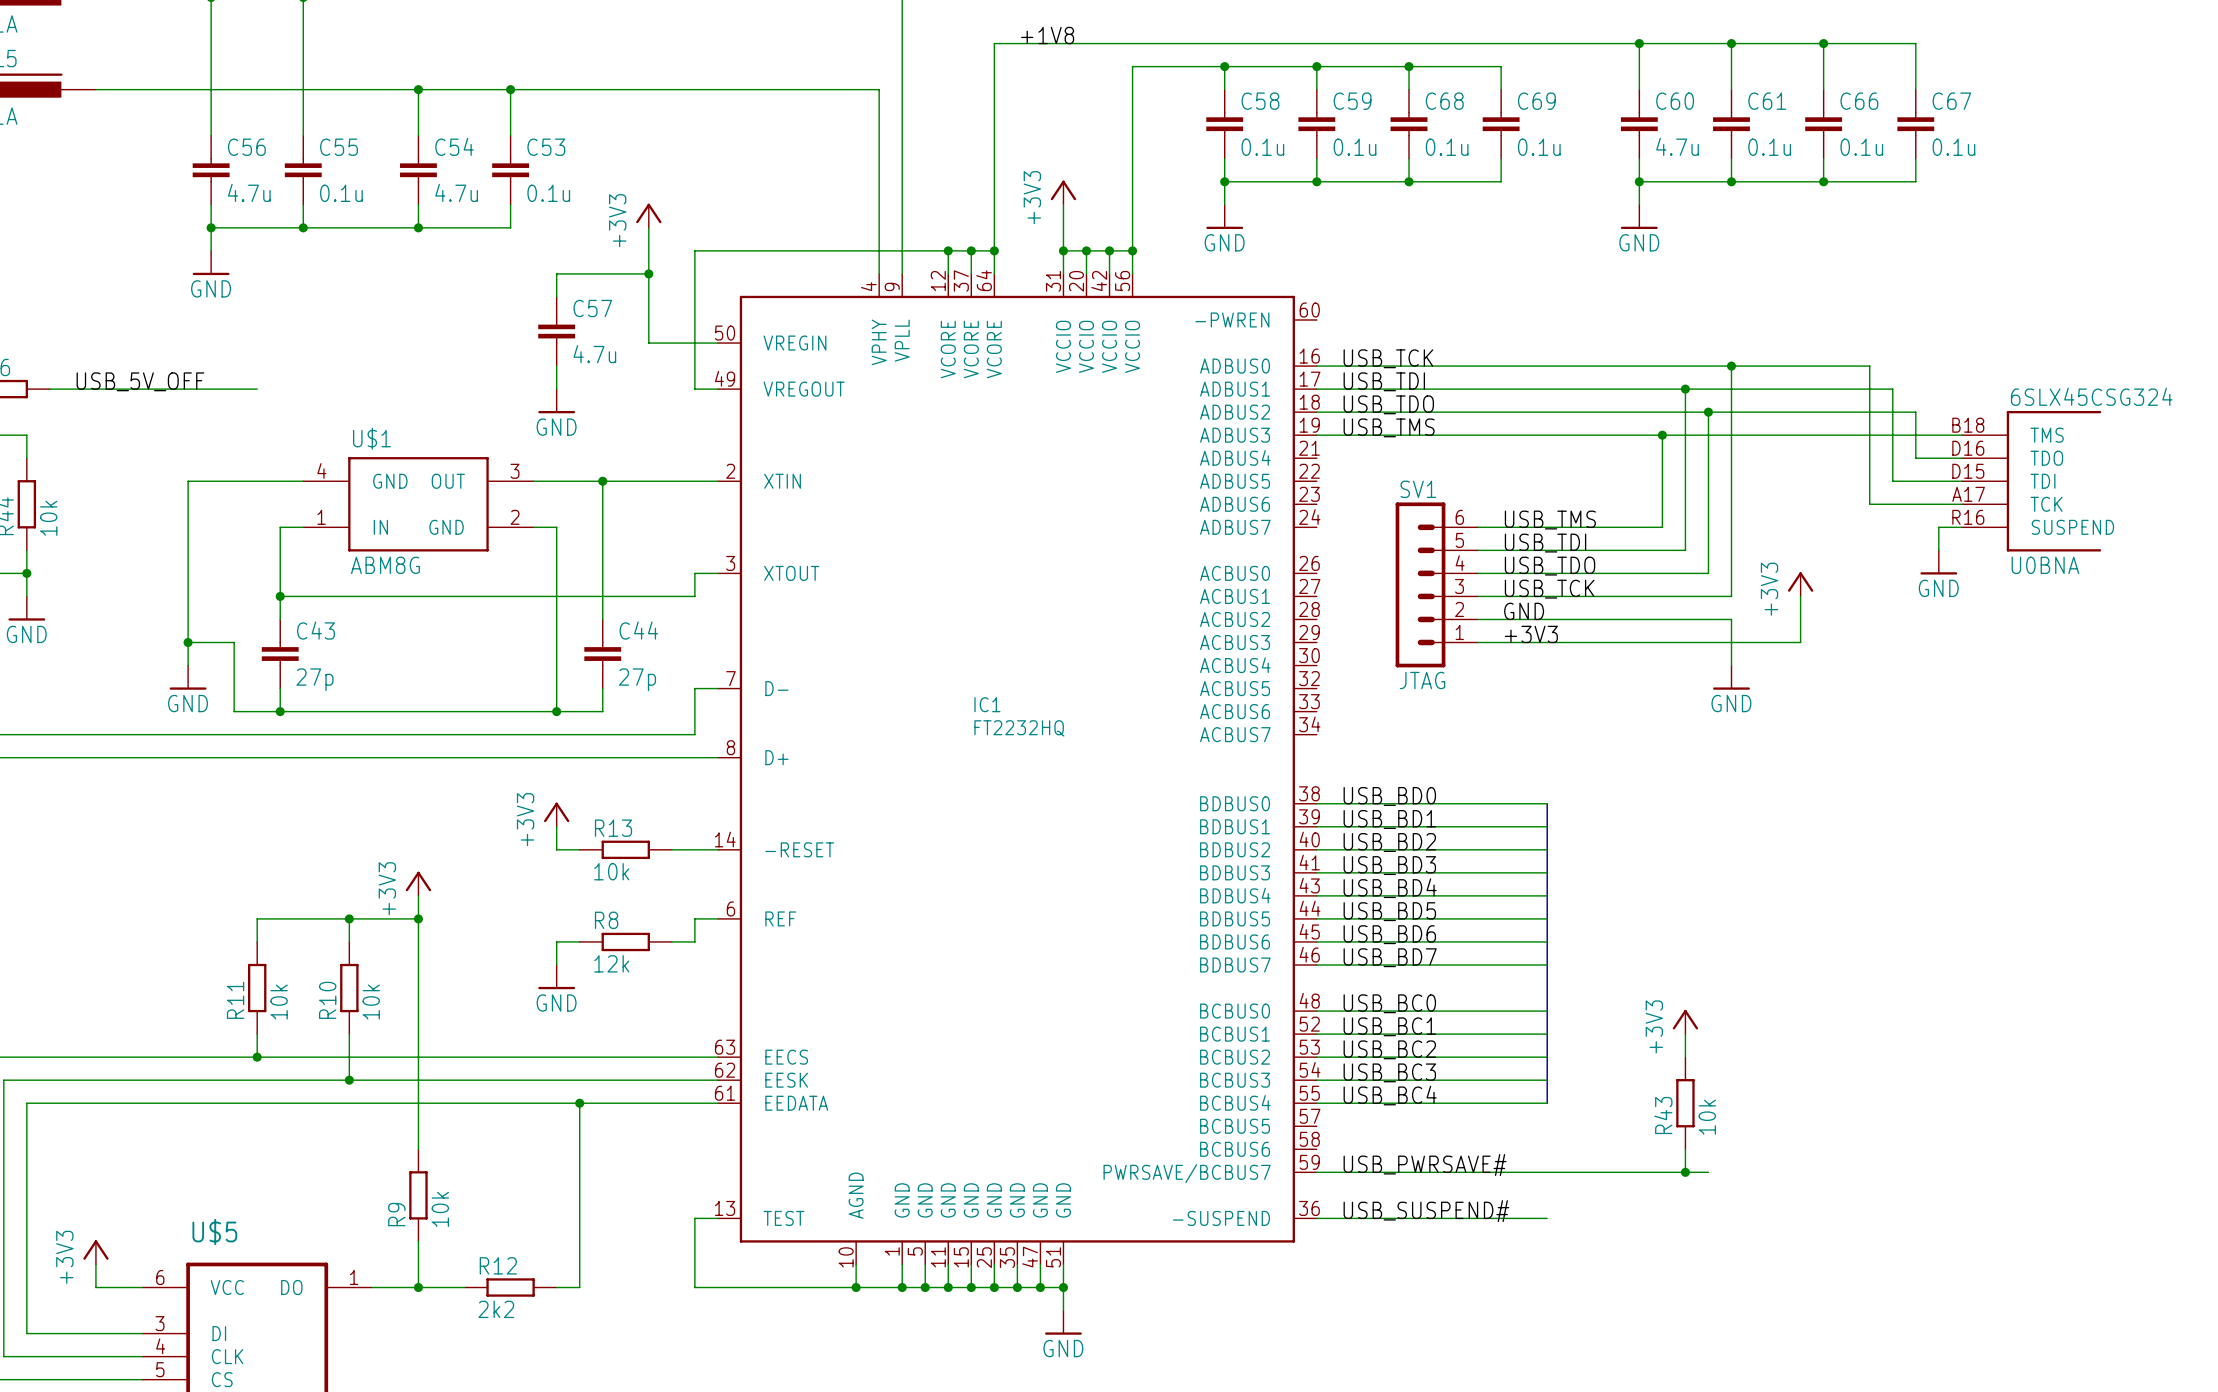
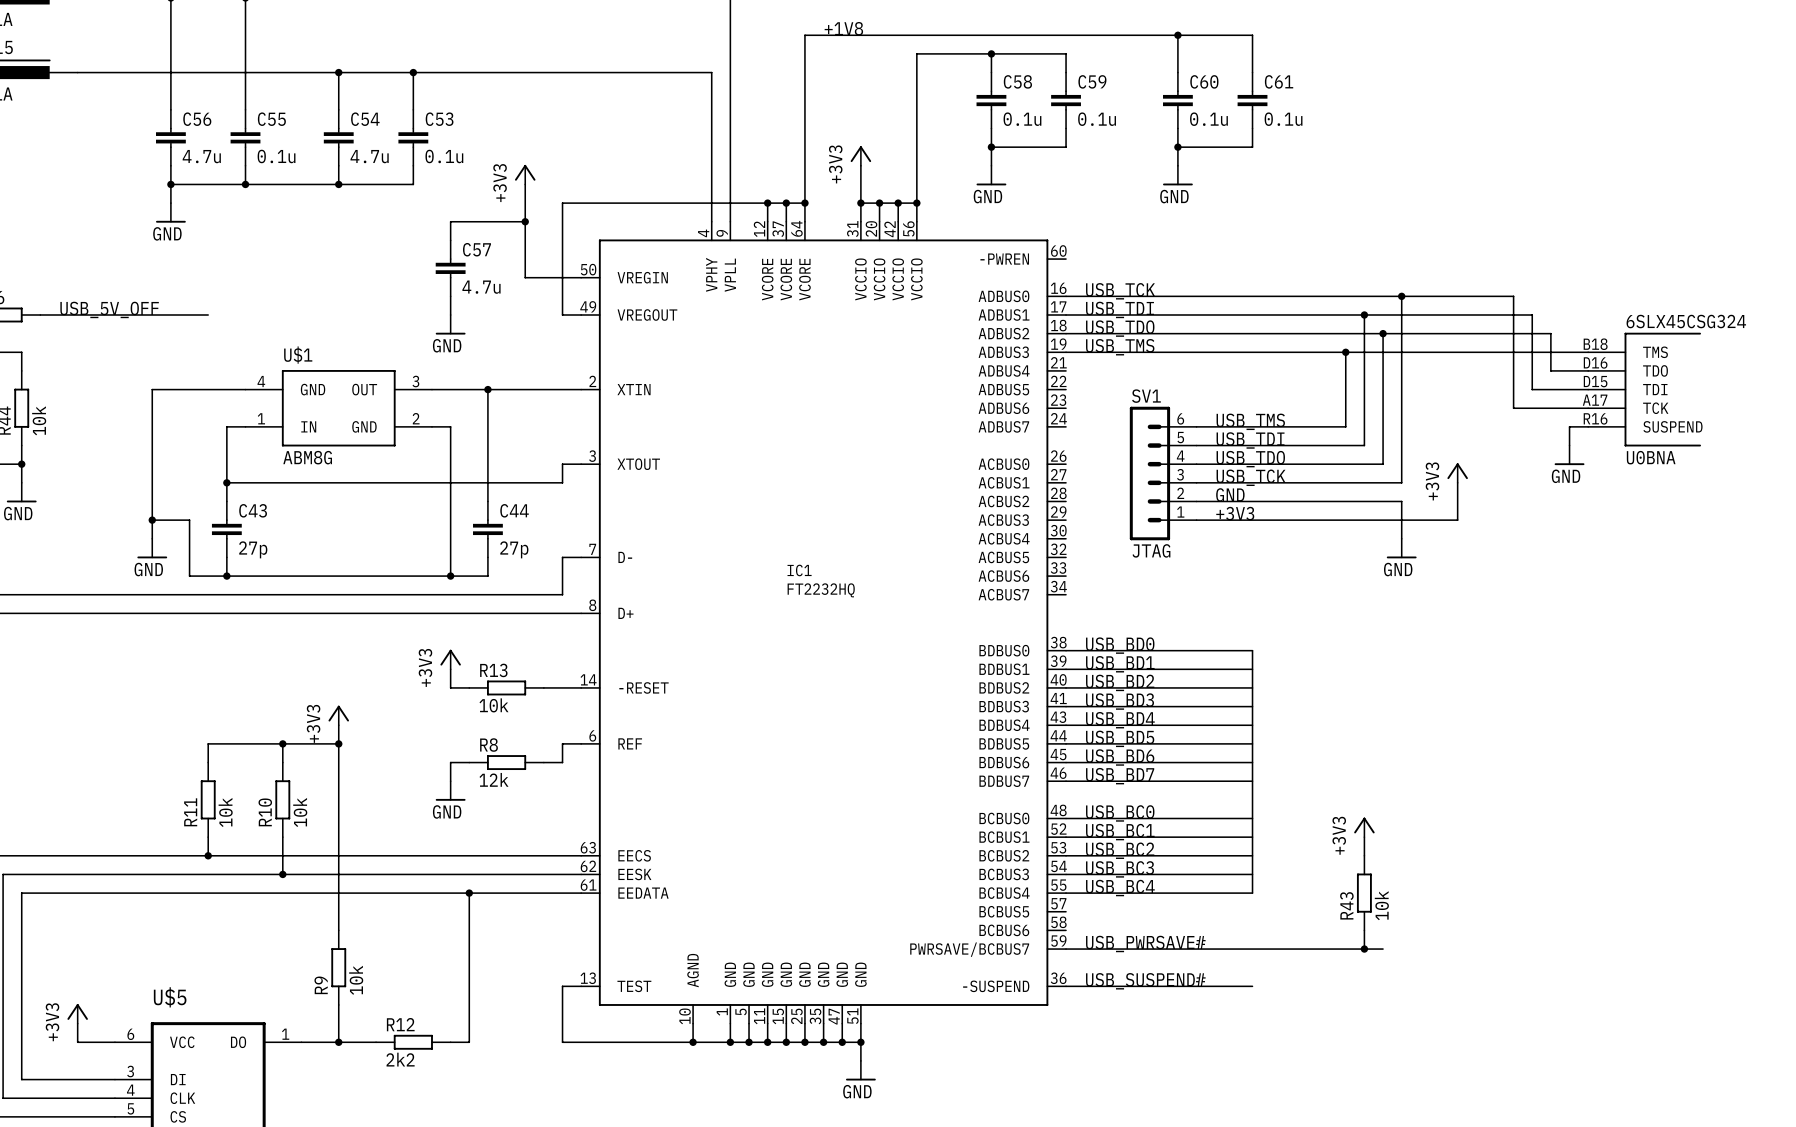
wire: (1547, 43) (1915, 43) (1915, 89) -> (1252, 35) (1252, 72)
wire: (1639, 43) (1639, 89) -> (1177, 35) (1177, 72)
junction: (1639, 43) -> none
wire: (1731, 43) (1731, 89) -> none
junction: (1731, 43) -> none
wire: (1823, 43) (1823, 89) -> none
junction: (1823, 43) -> none
wire: (1316, 66) (1501, 66) (1501, 89) -> none
junction: (1316, 66) -> none
wire: (1408, 66) (1408, 89) -> none
junction position: (1408, 66) -> (1177, 35)
C68: 0.1u (1408, 124) -> none
C69: 0.1u (1501, 124) -> none
C60 position: (1639, 124) -> (1177, 100)
C61 position: (1731, 124) -> (1252, 100)
C66: 0.1u (1823, 124) -> none
C67: 0.1u (1915, 124) -> none
C60 value: 4.7u (1677, 146) -> 0.1u (1208, 119)
wire: (1408, 158) (1408, 181) -> none
wire: (1501, 158) (1501, 181) -> (1252, 128) (1252, 147) (1215, 147)
wire: (1639, 158) (1639, 204) -> (1177, 128) (1177, 165)
wire: (1731, 158) (1731, 181) -> none
wire: (1823, 158) (1823, 181) -> none
wire: (1915, 158) (1915, 181) (1639, 181) -> none
wire: (1316, 181) (1455, 181) -> none
junction: (1316, 181) -> none
junction position: (1408, 181) -> (1177, 147)
junction: (1639, 181) -> none
junction: (1731, 181) -> none
junction: (1823, 181) -> none
power symbol position: GND (1639, 216) -> GND (1177, 175)

